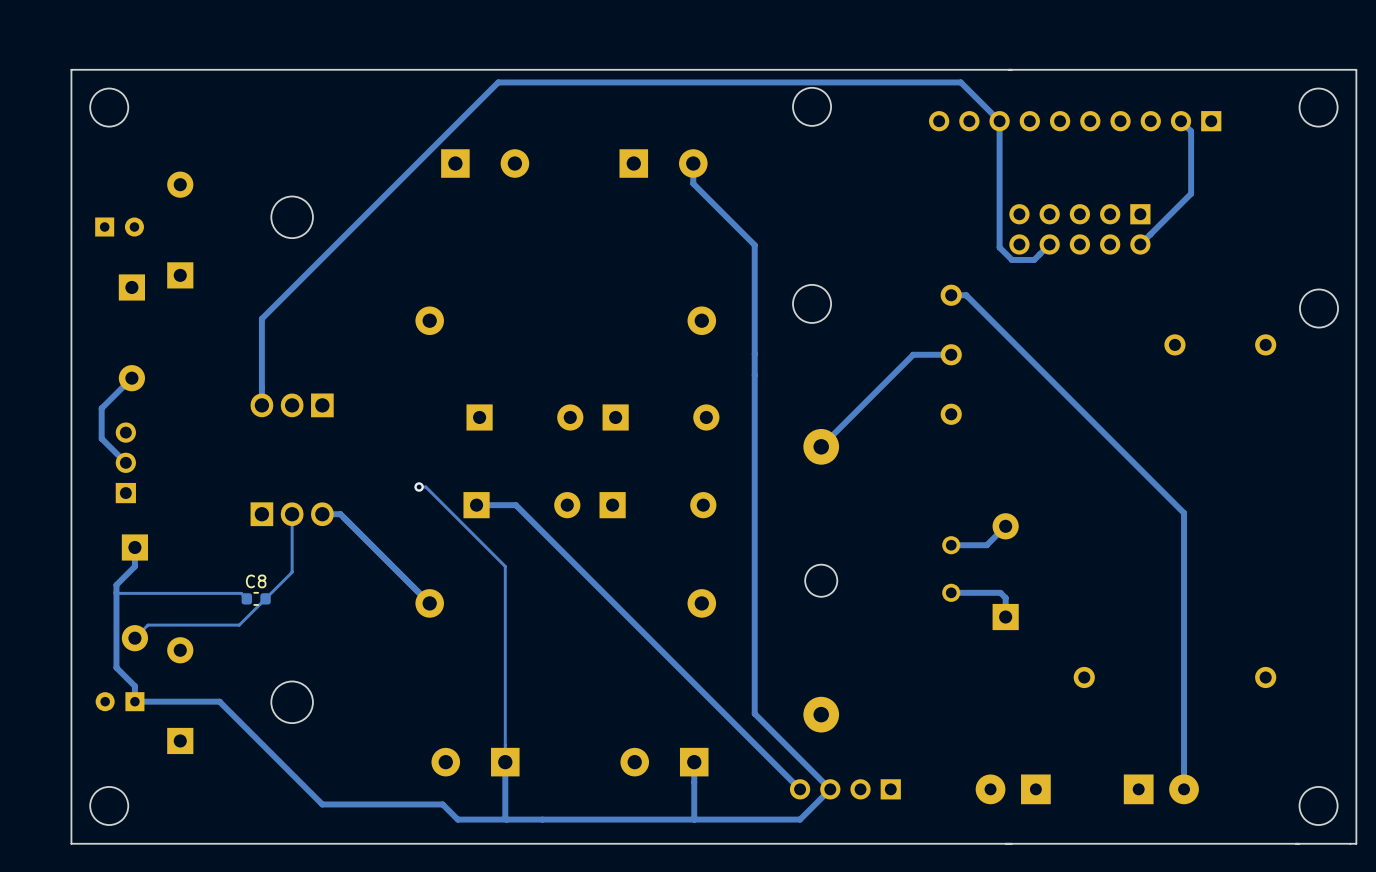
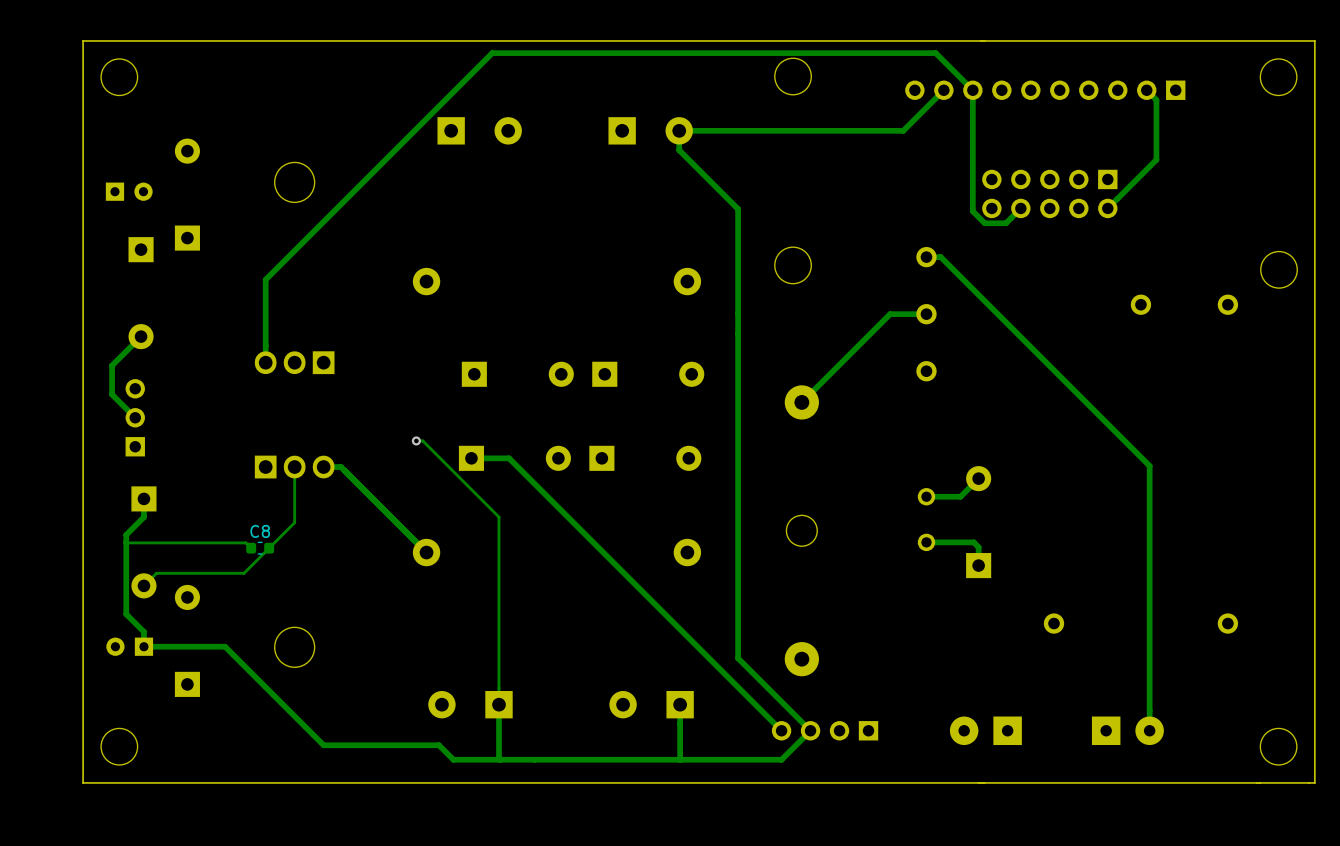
track: none -> (943, 90) (903, 130) (679, 130)

